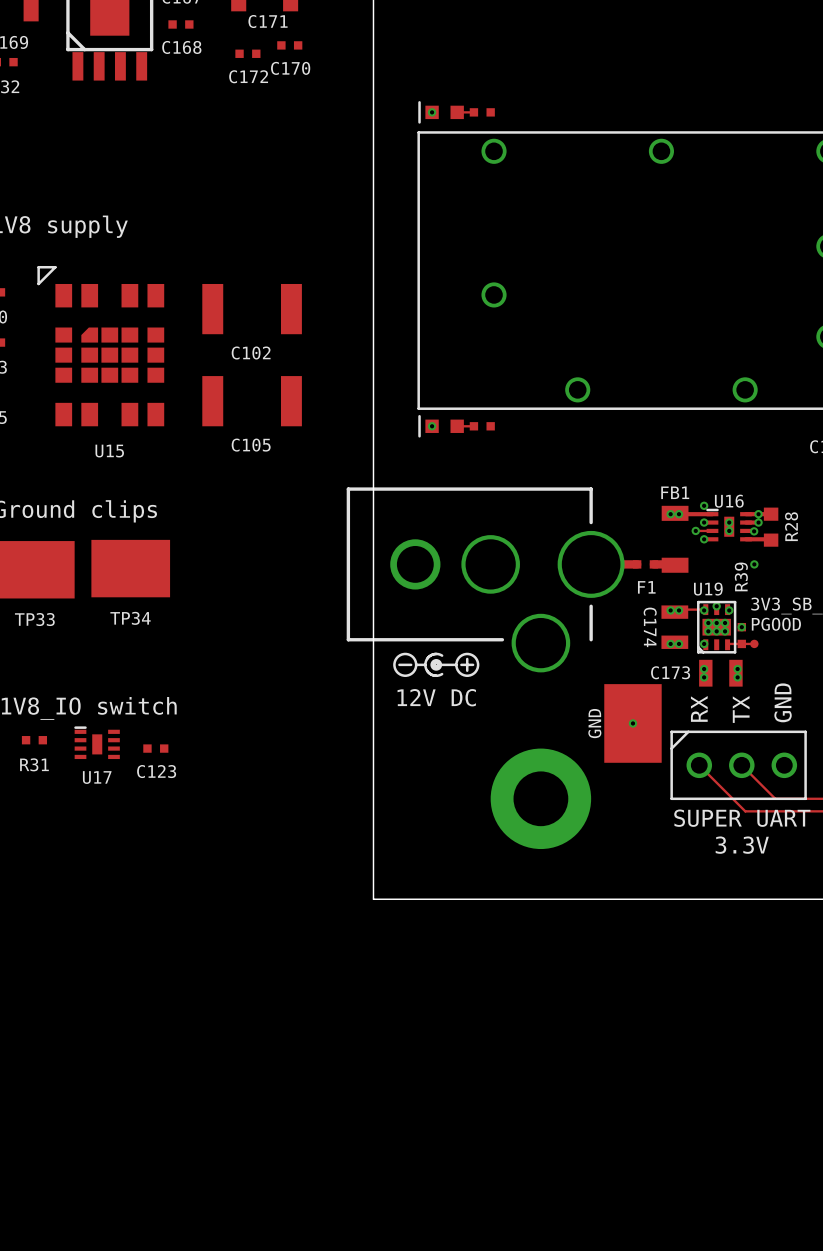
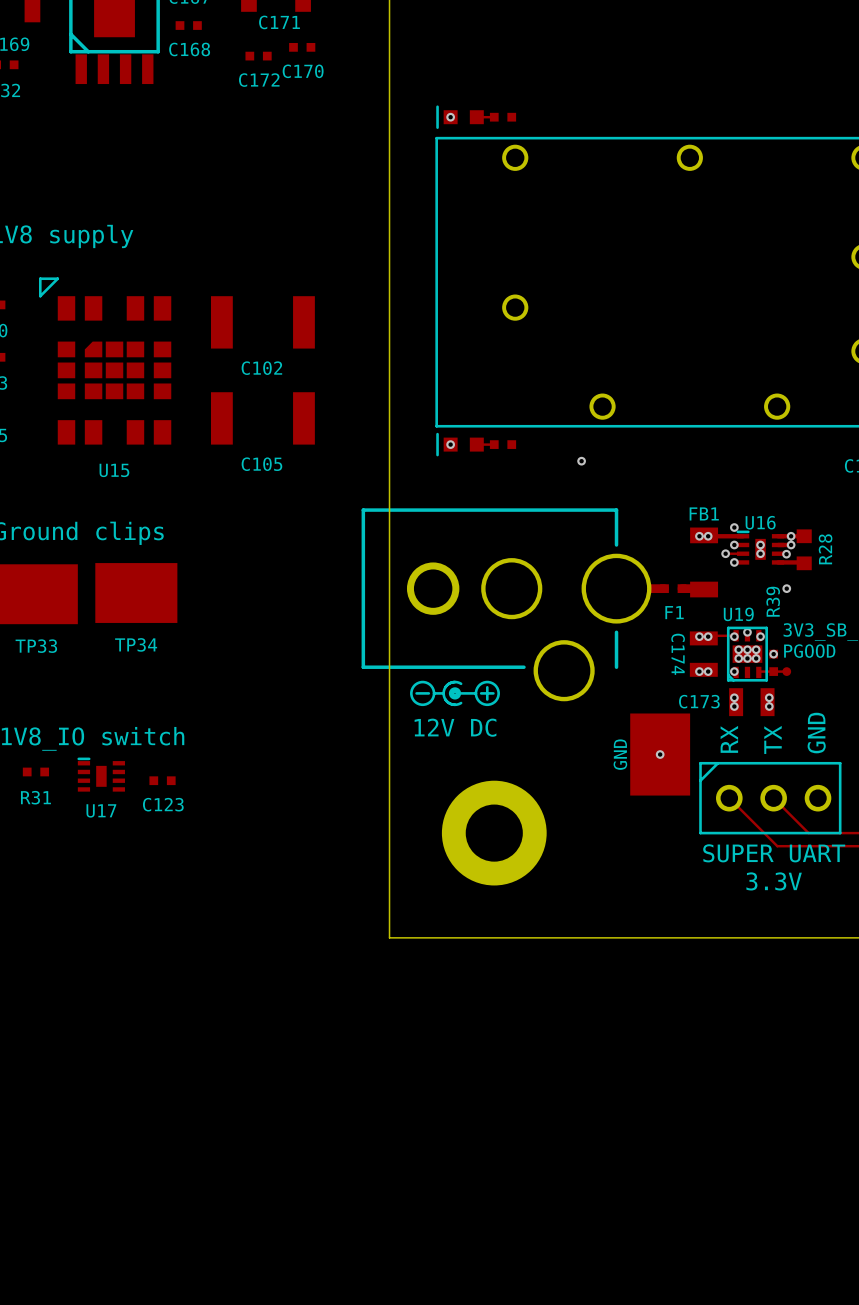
via: none -> (581, 461)
part position: (540, 798) -> (494, 833)

